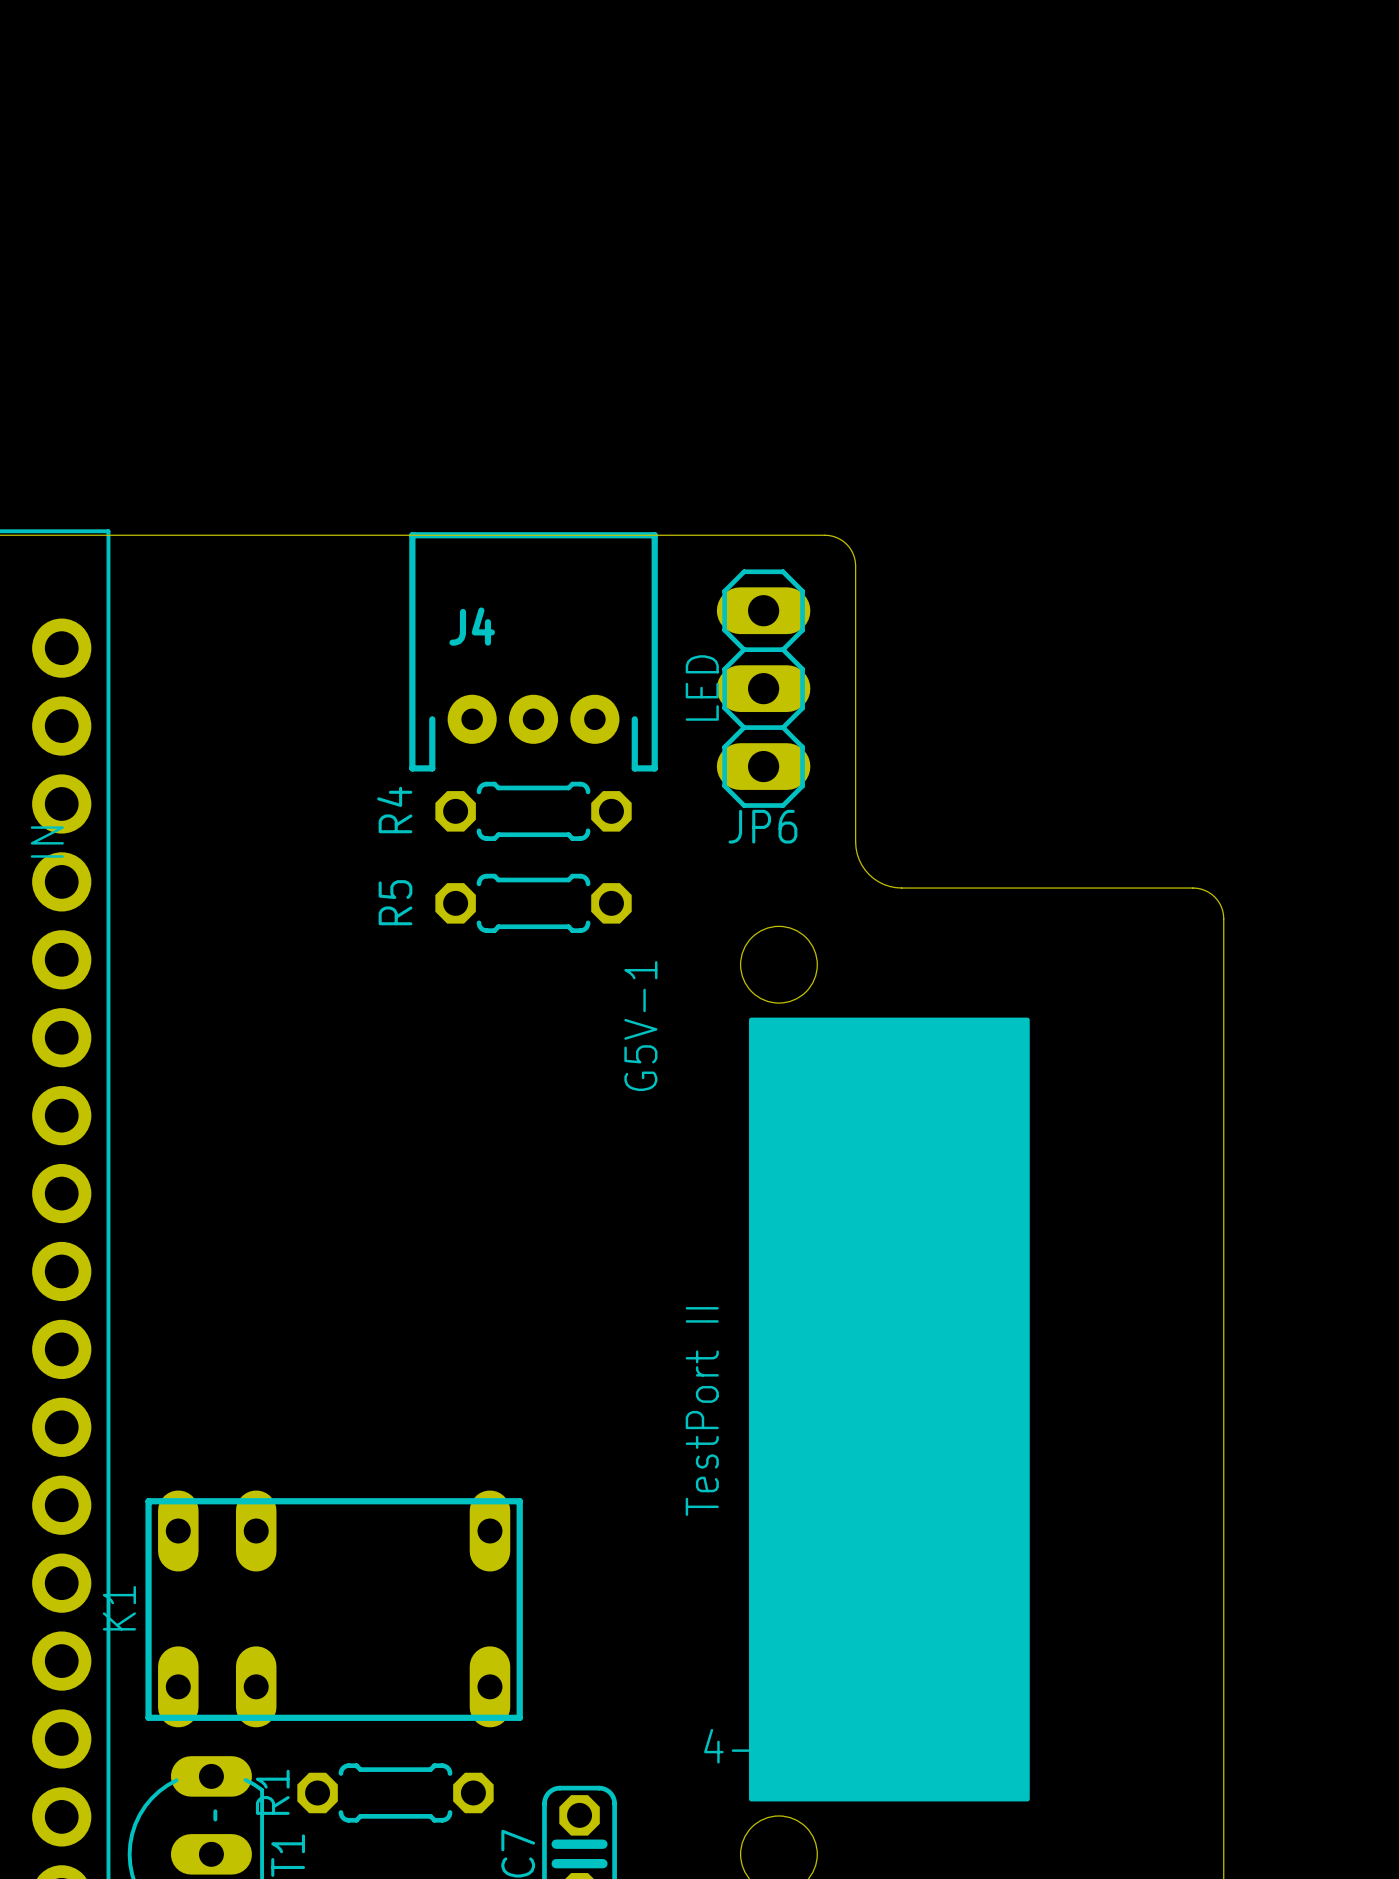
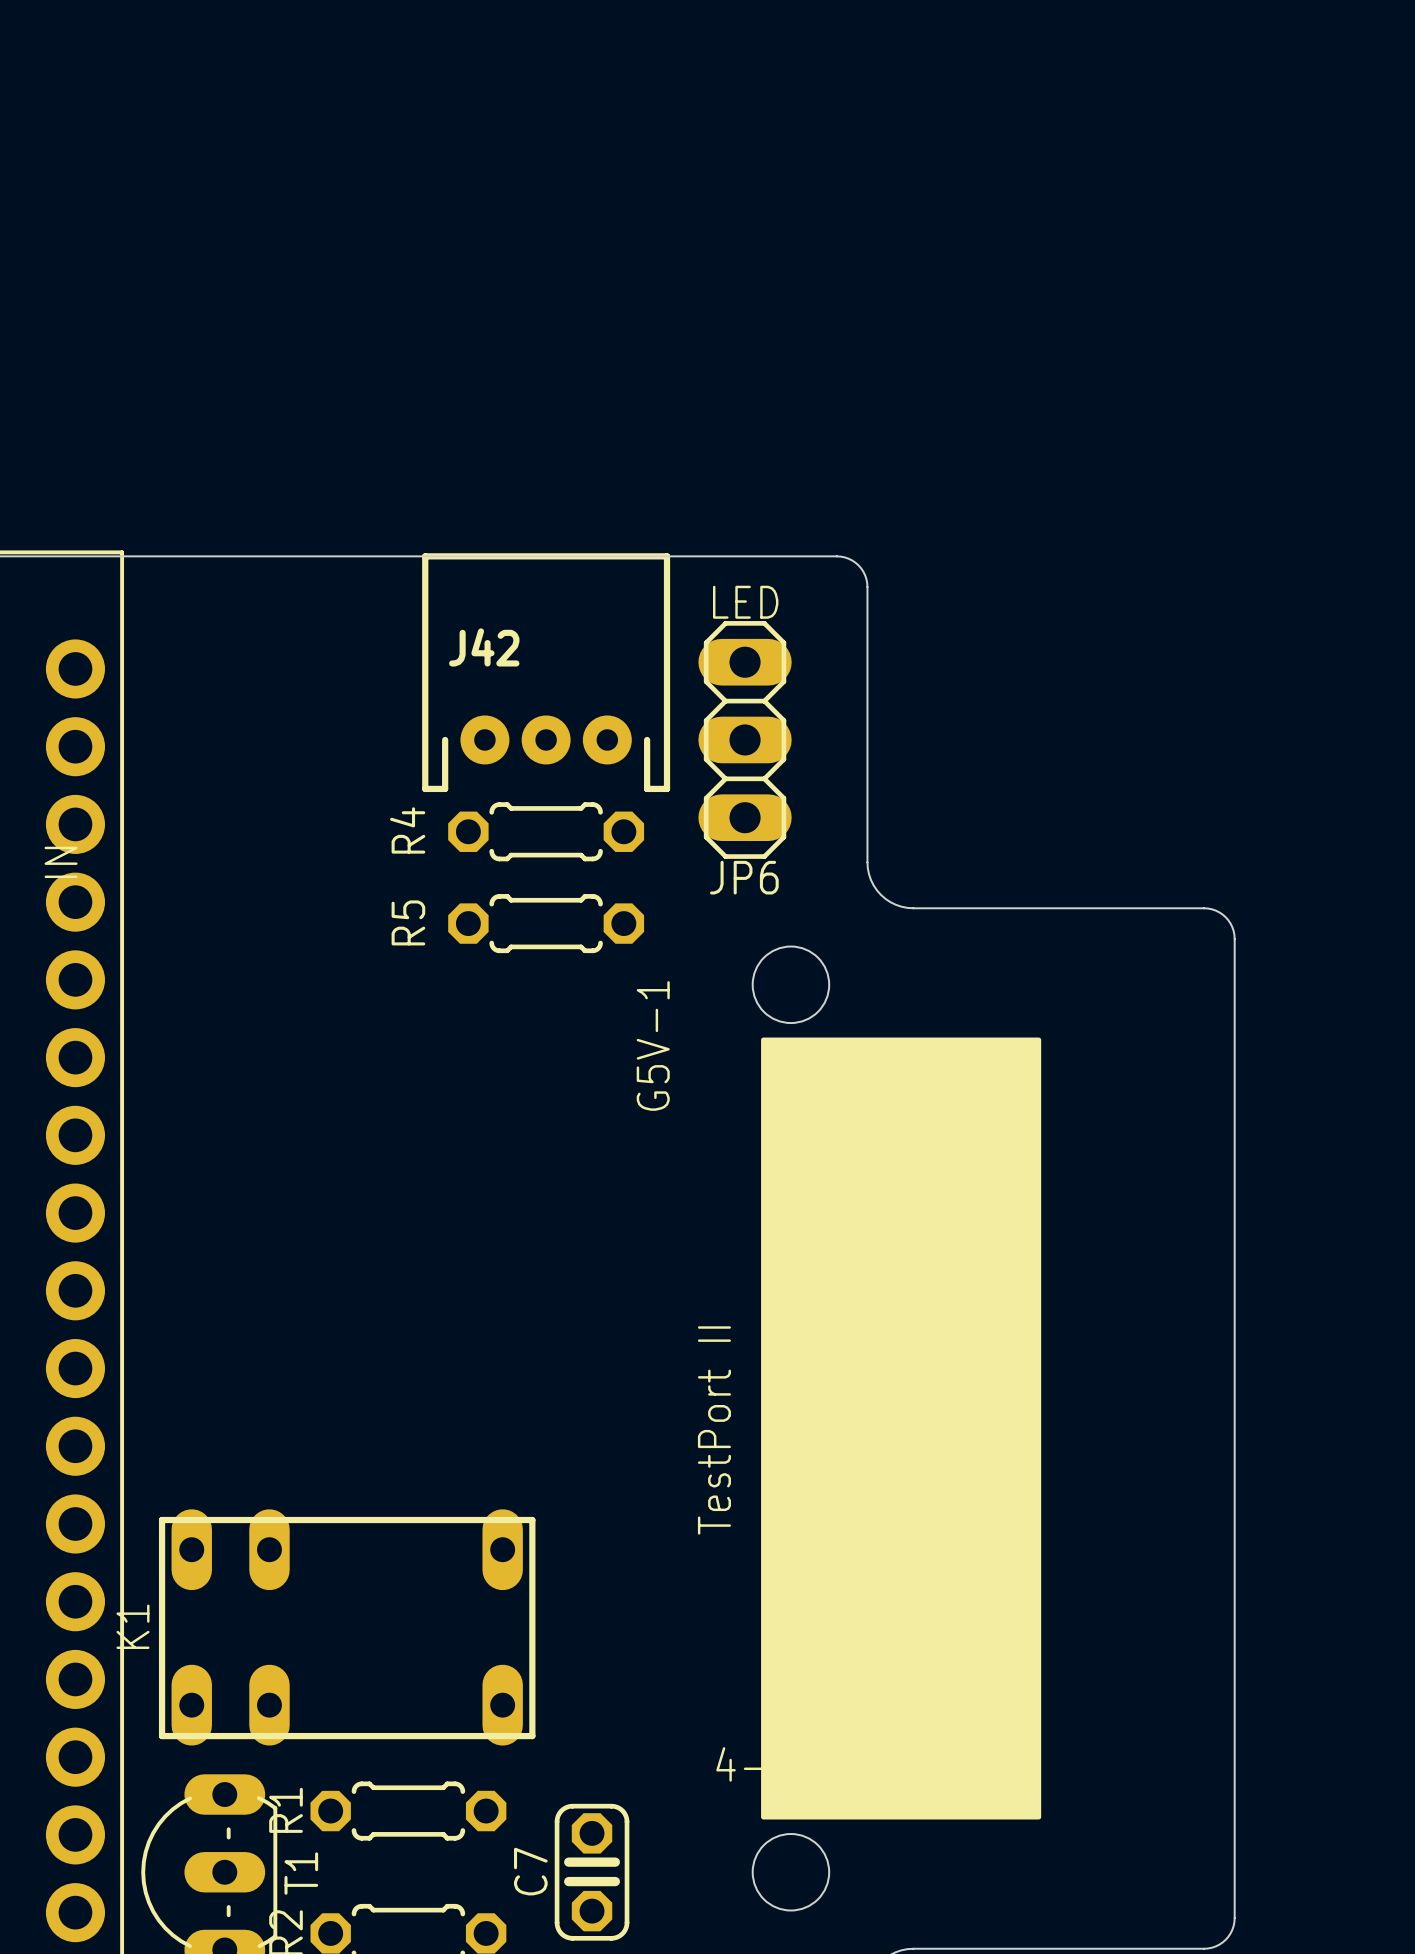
J4 name: J4 (472, 626) -> J42 (484, 647)
text rotation: 0° (702, 687) -> 90° clockwise (745, 602)
text position: LED (702, 687) -> LED (745, 602)
JP6 position: (763, 688) -> (745, 739)

